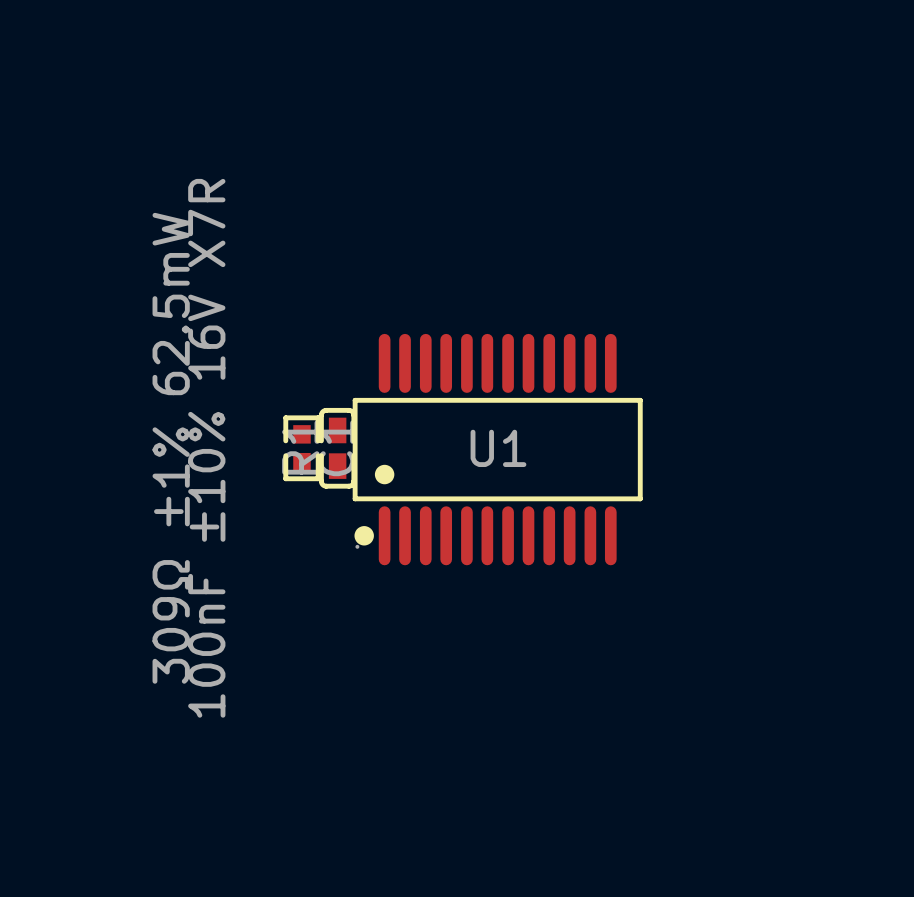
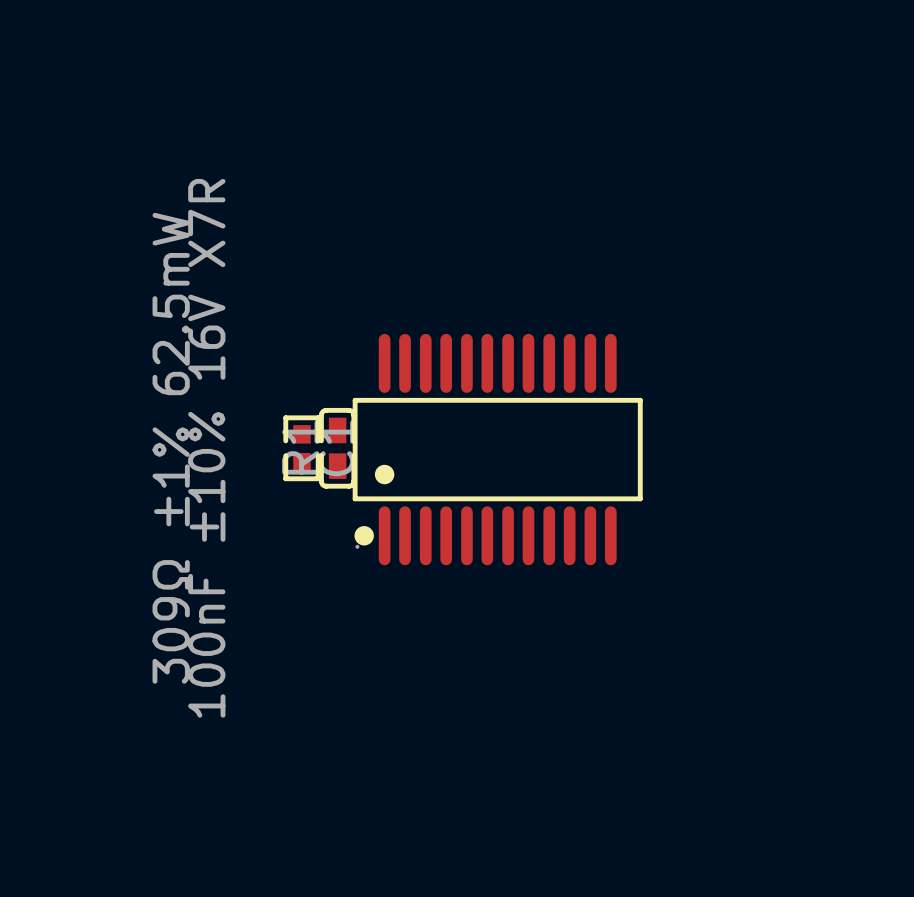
U1 name: U1 (498, 448) -> none

